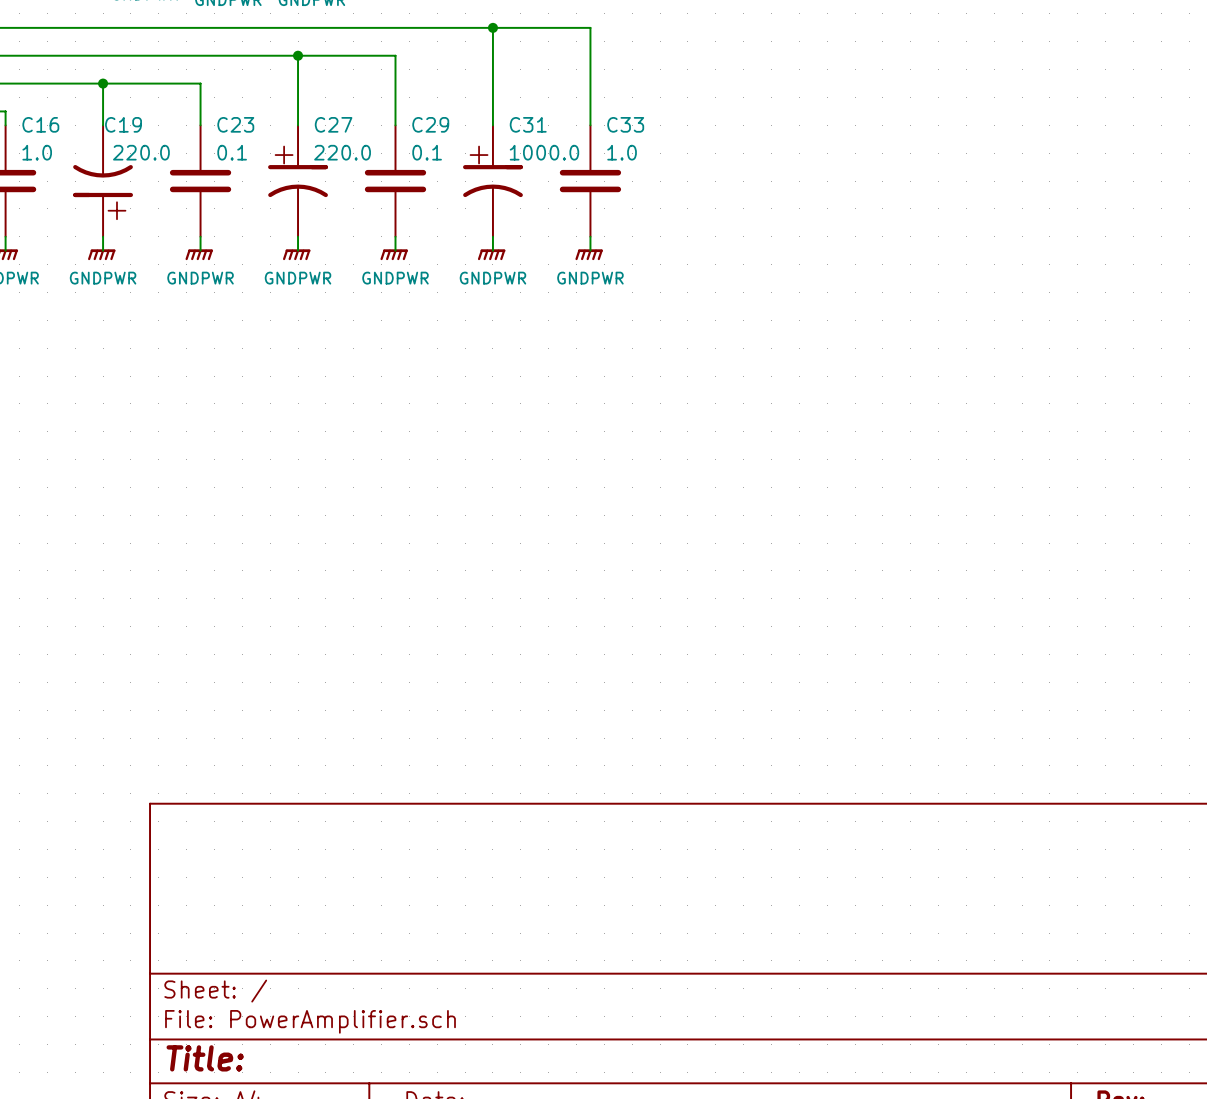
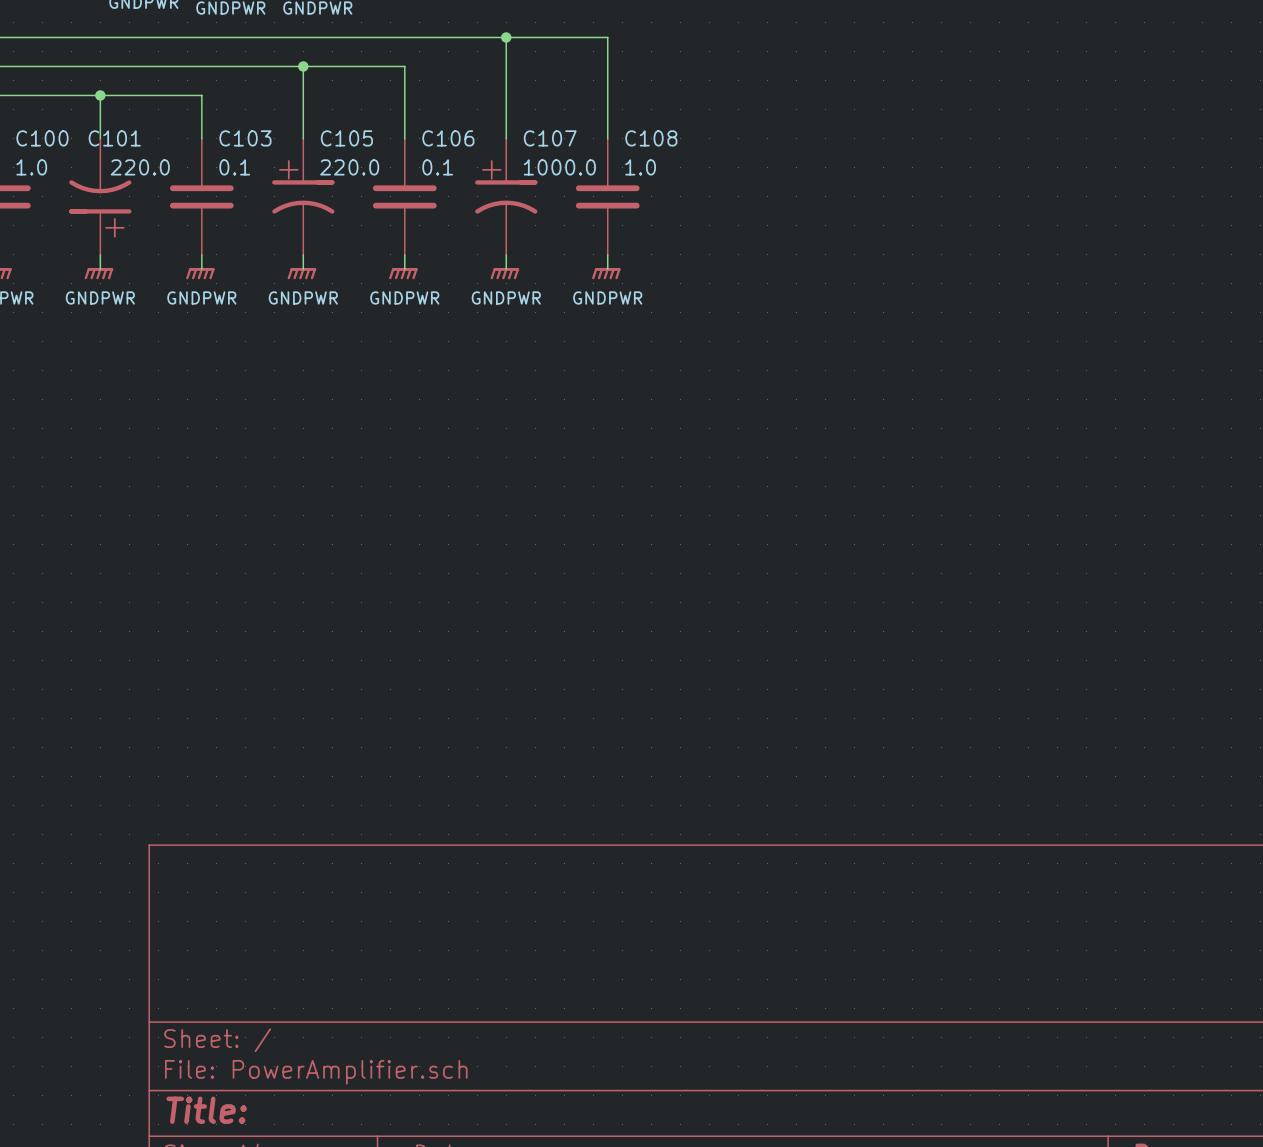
C16 name: C16 (40, 124) -> C100 (42, 138)
C19 name: C19 (123, 124) -> C101 (114, 138)
C23 name: C23 (235, 124) -> C103 (245, 138)
C27 name: C27 (333, 124) -> C105 (346, 138)
C29 name: C29 (430, 124) -> C106 (448, 138)
C31 name: C31 (528, 124) -> C107 (550, 138)
C33 name: C33 (625, 124) -> C108 (651, 138)

